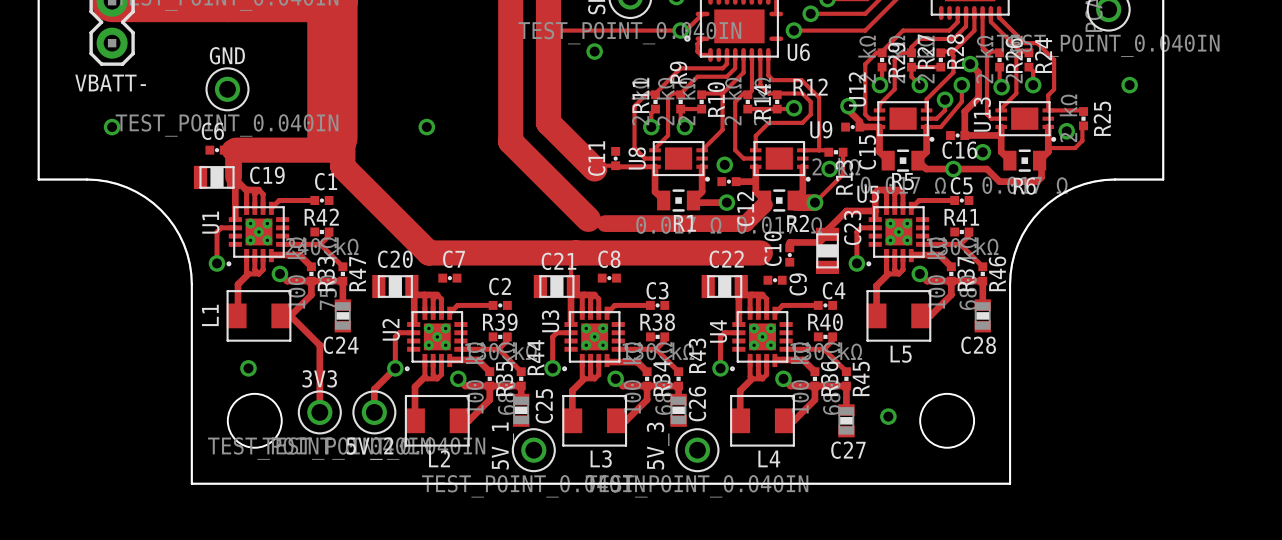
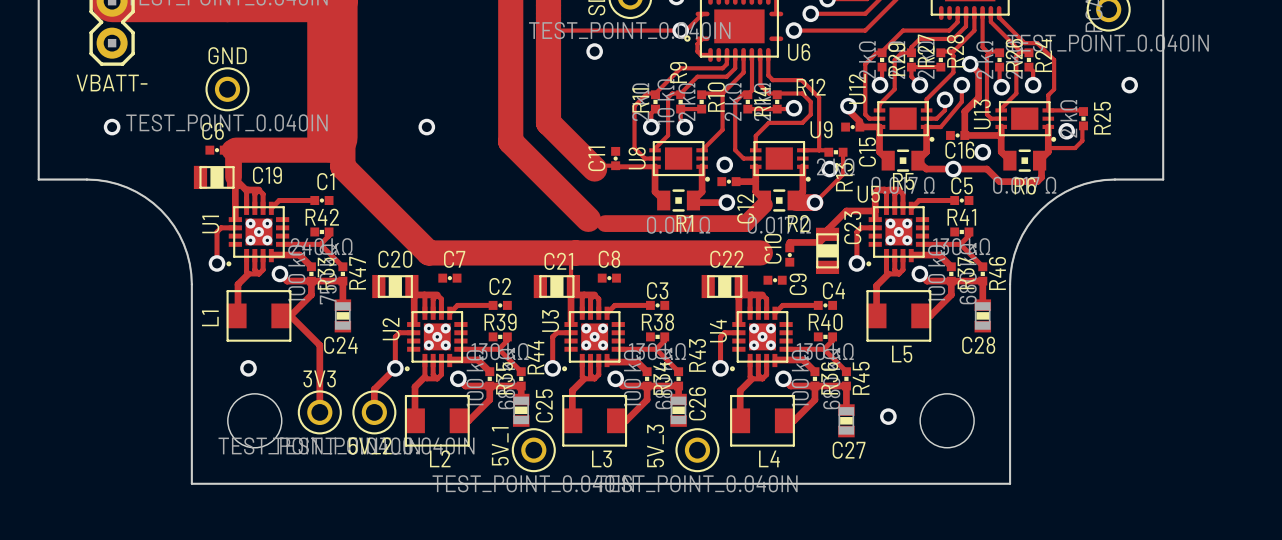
R9 value: 2 kΩ (665, 101) -> 10 kΩ (666, 102)

